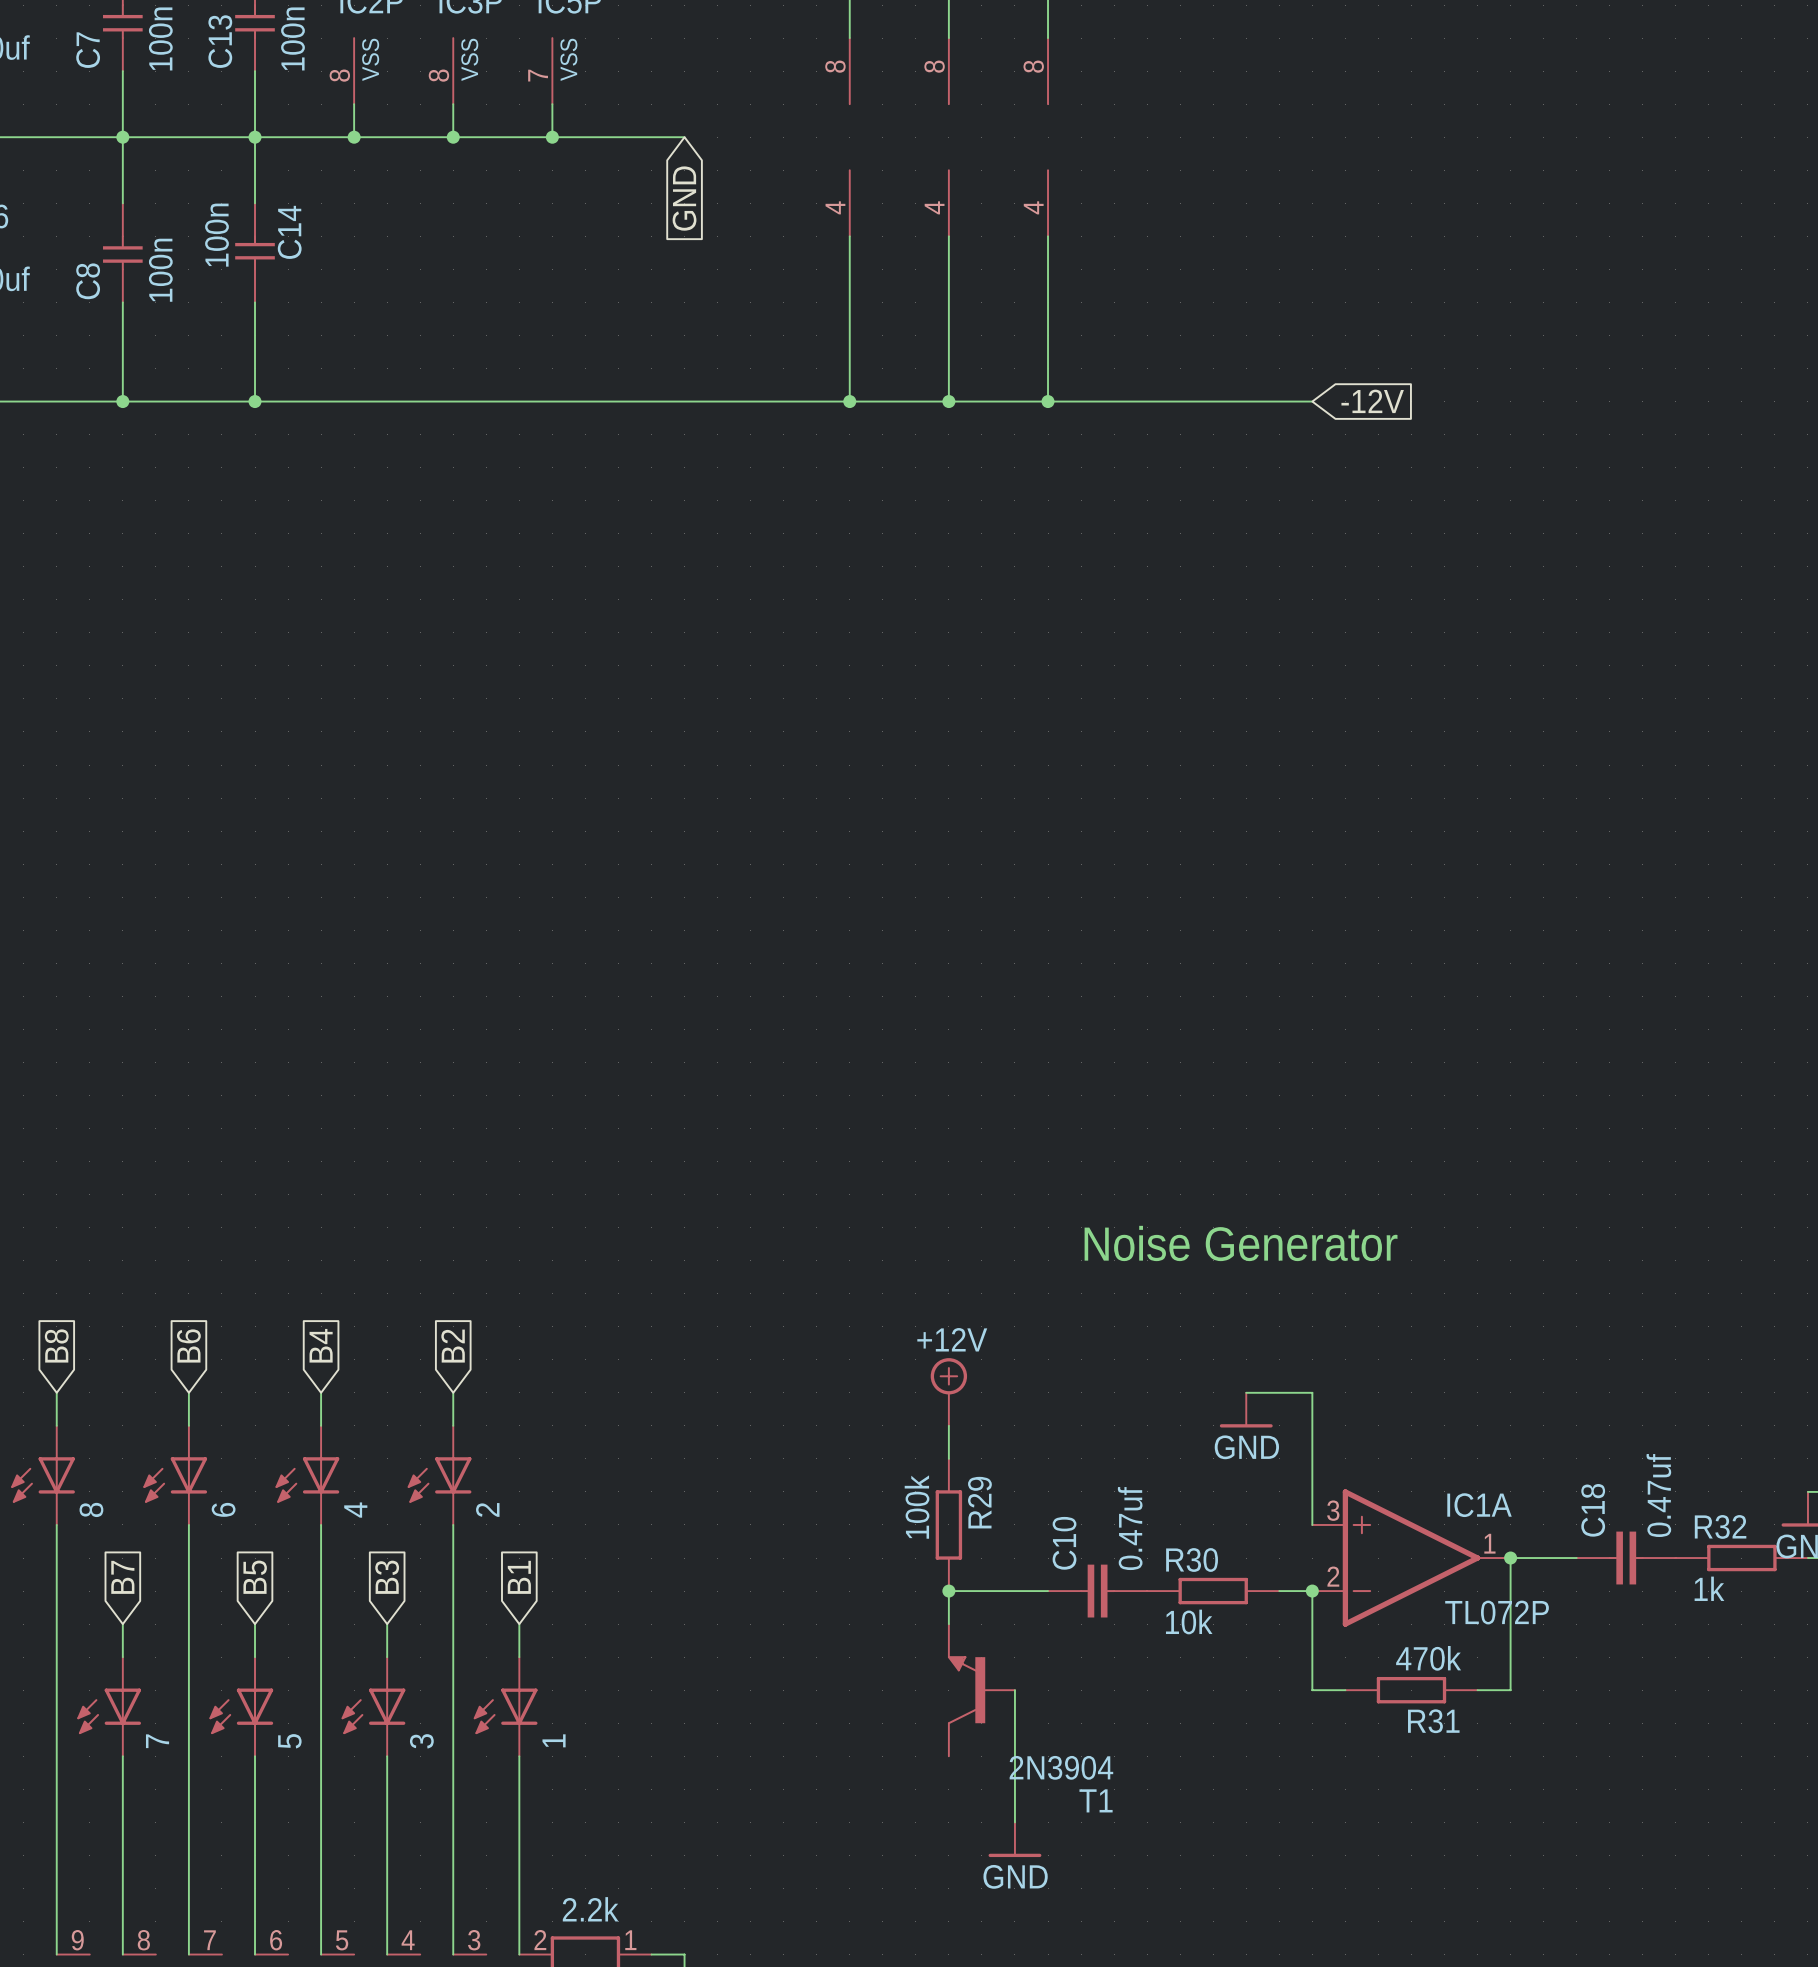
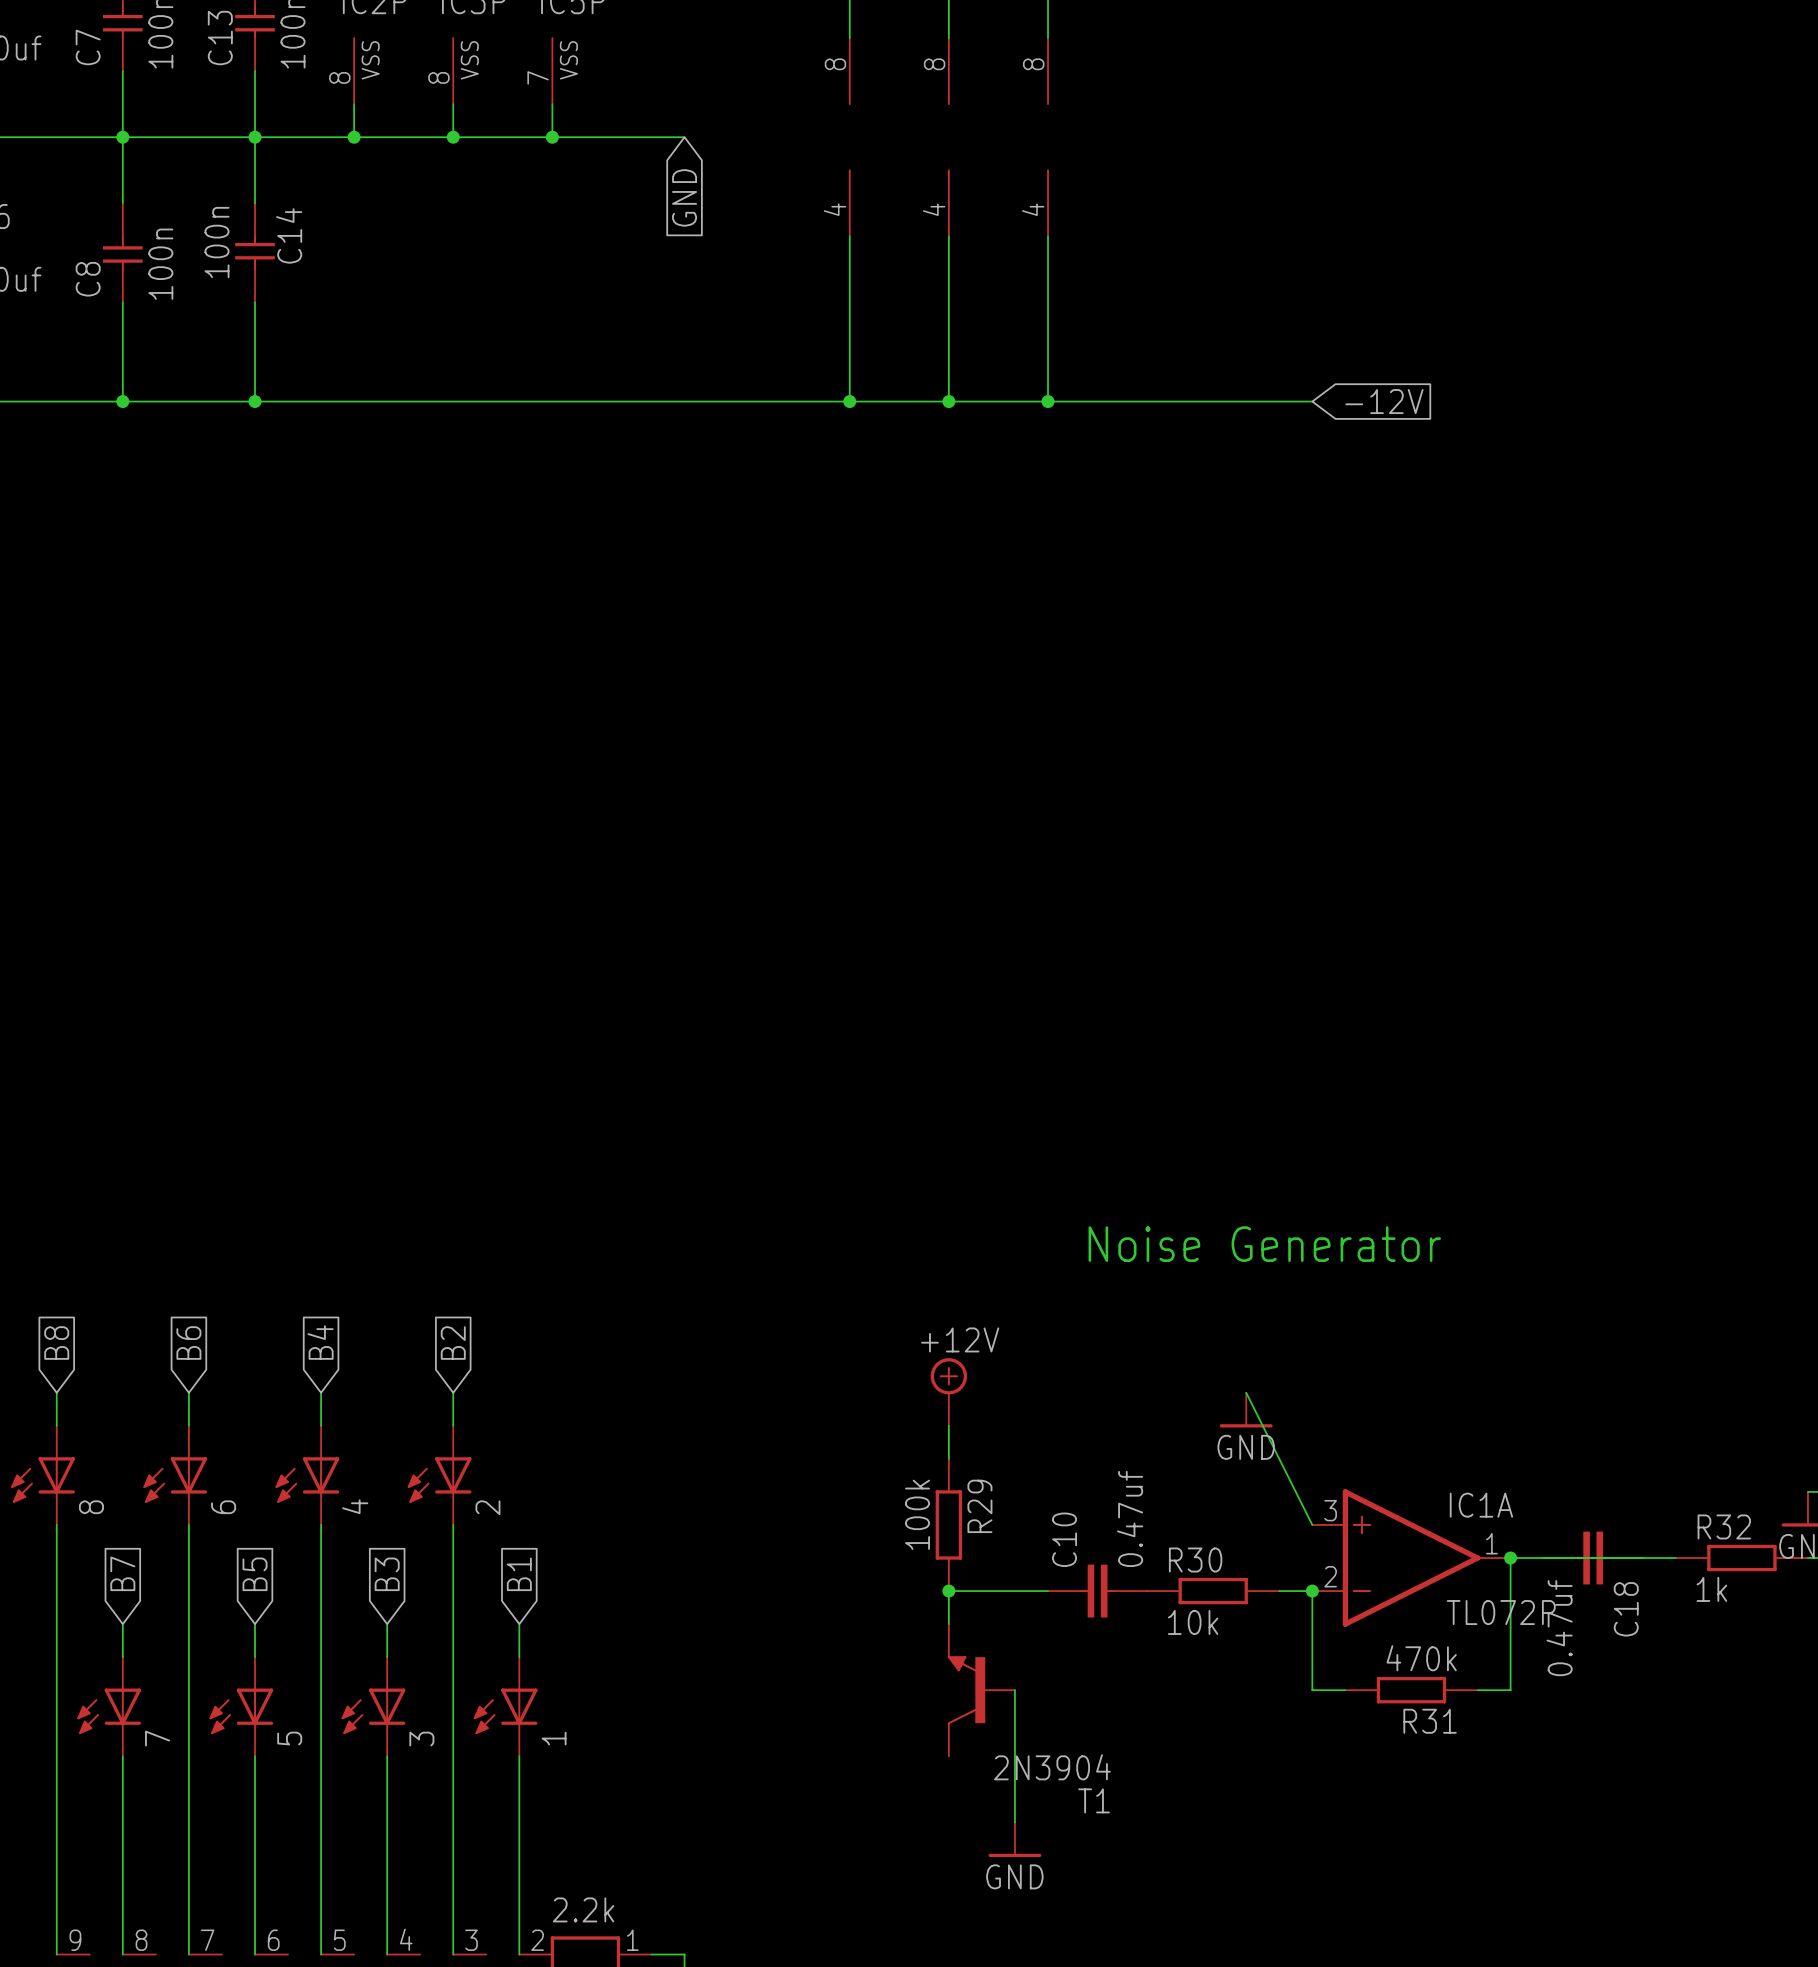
wire: (1246, 1392) (1312, 1392) (1312, 1524) -> (1246, 1392) (1312, 1524)
C18 value position: 0.47uf (1658, 1495) -> 0.47uf (1559, 1628)
C18 name position: C18 (1593, 1510) -> C18 (1626, 1609)
C18 position: (1626, 1558) -> (1593, 1558)

